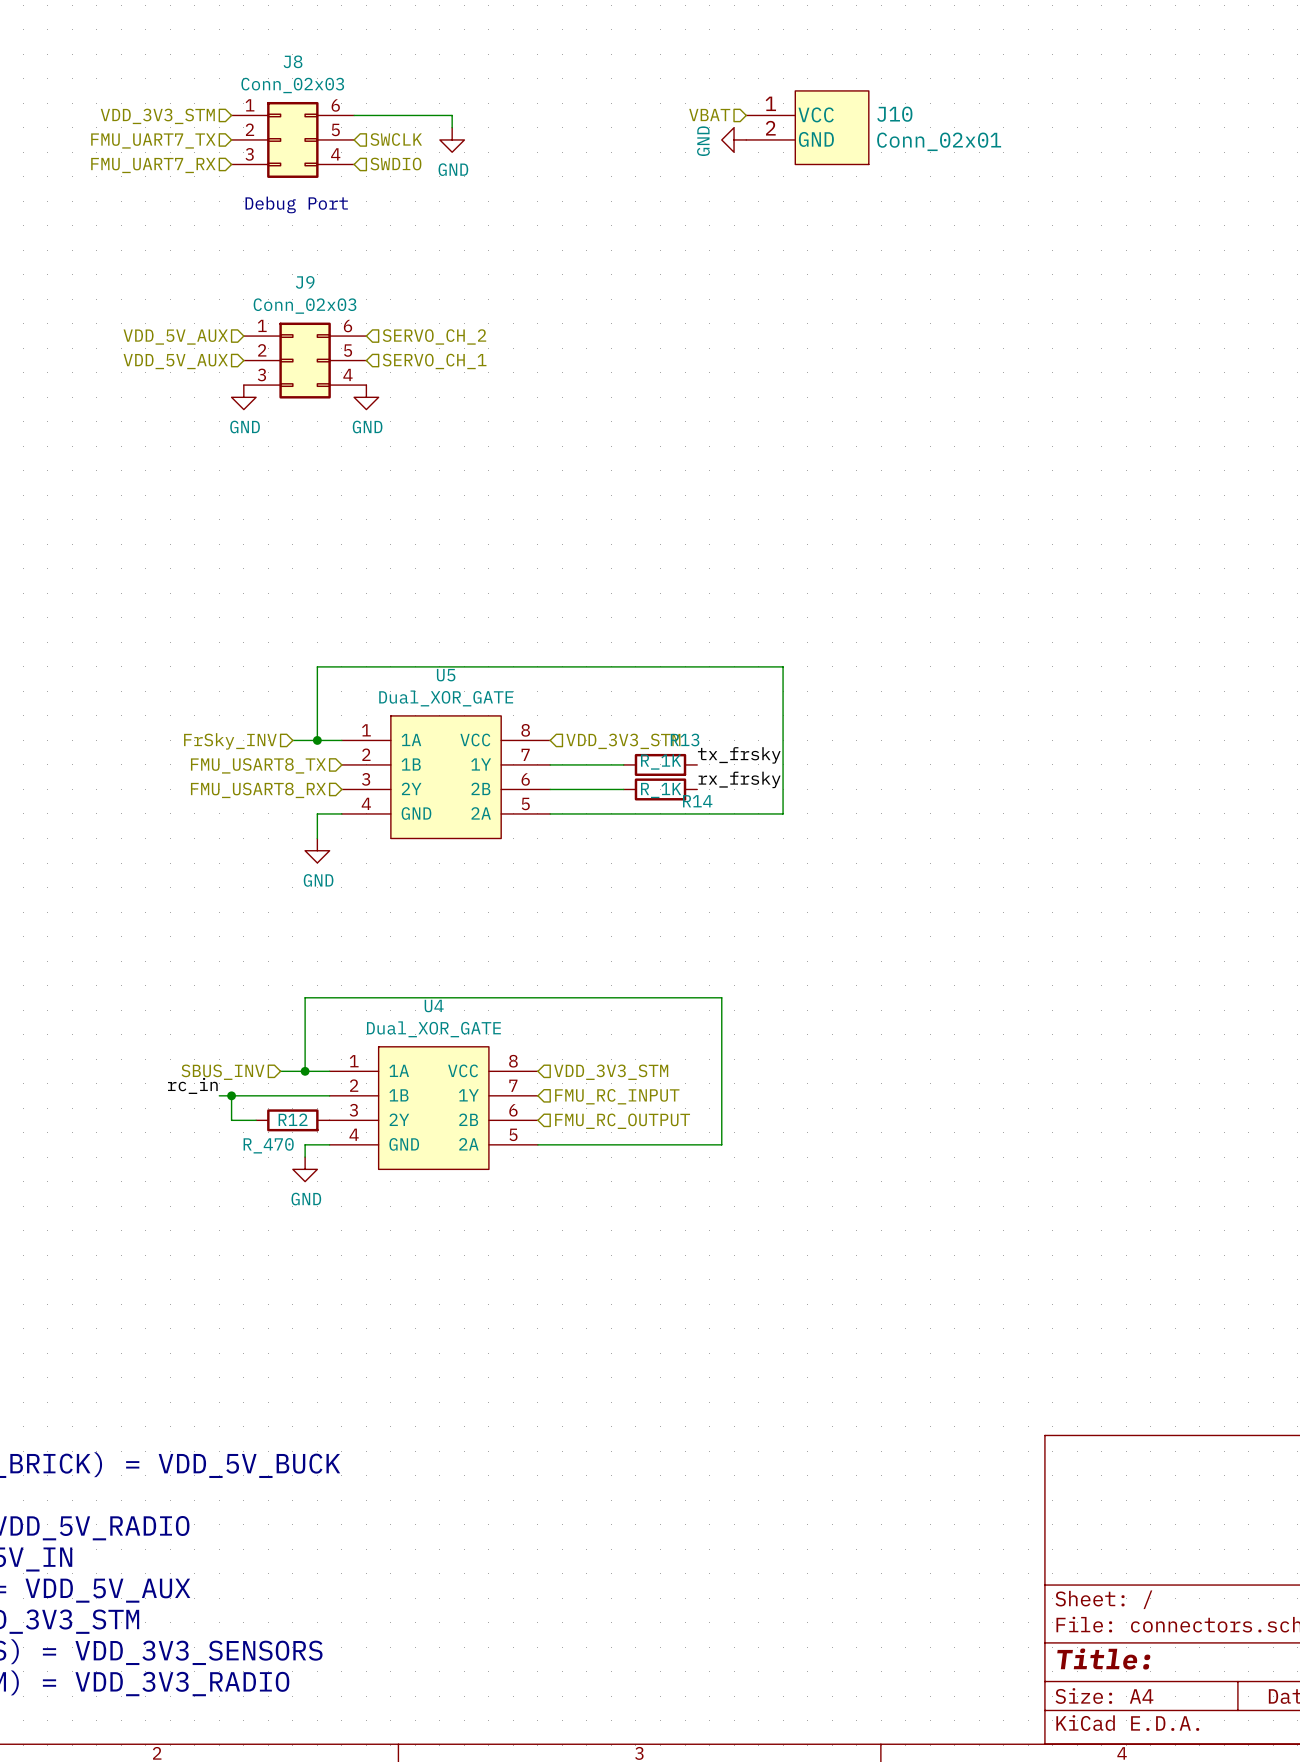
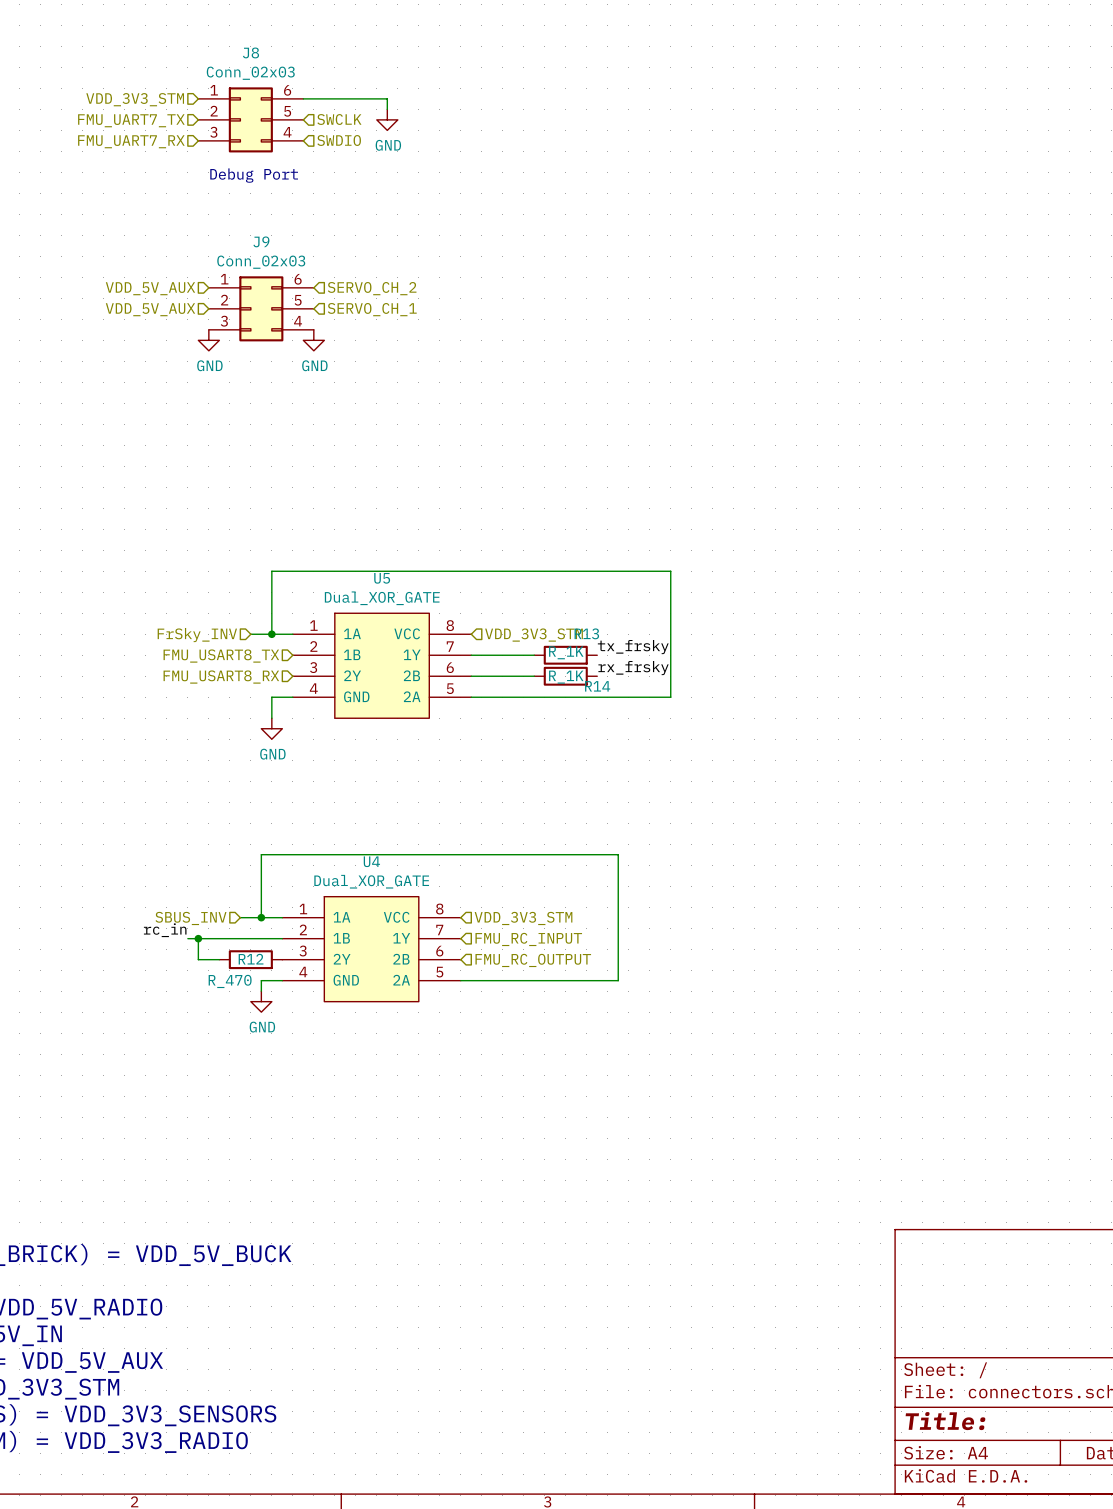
hierarchical label: VBAT (709, 115) -> none
J10: Conn_02x01 (807, 127) -> none
power symbol: GND (734, 139) -> none

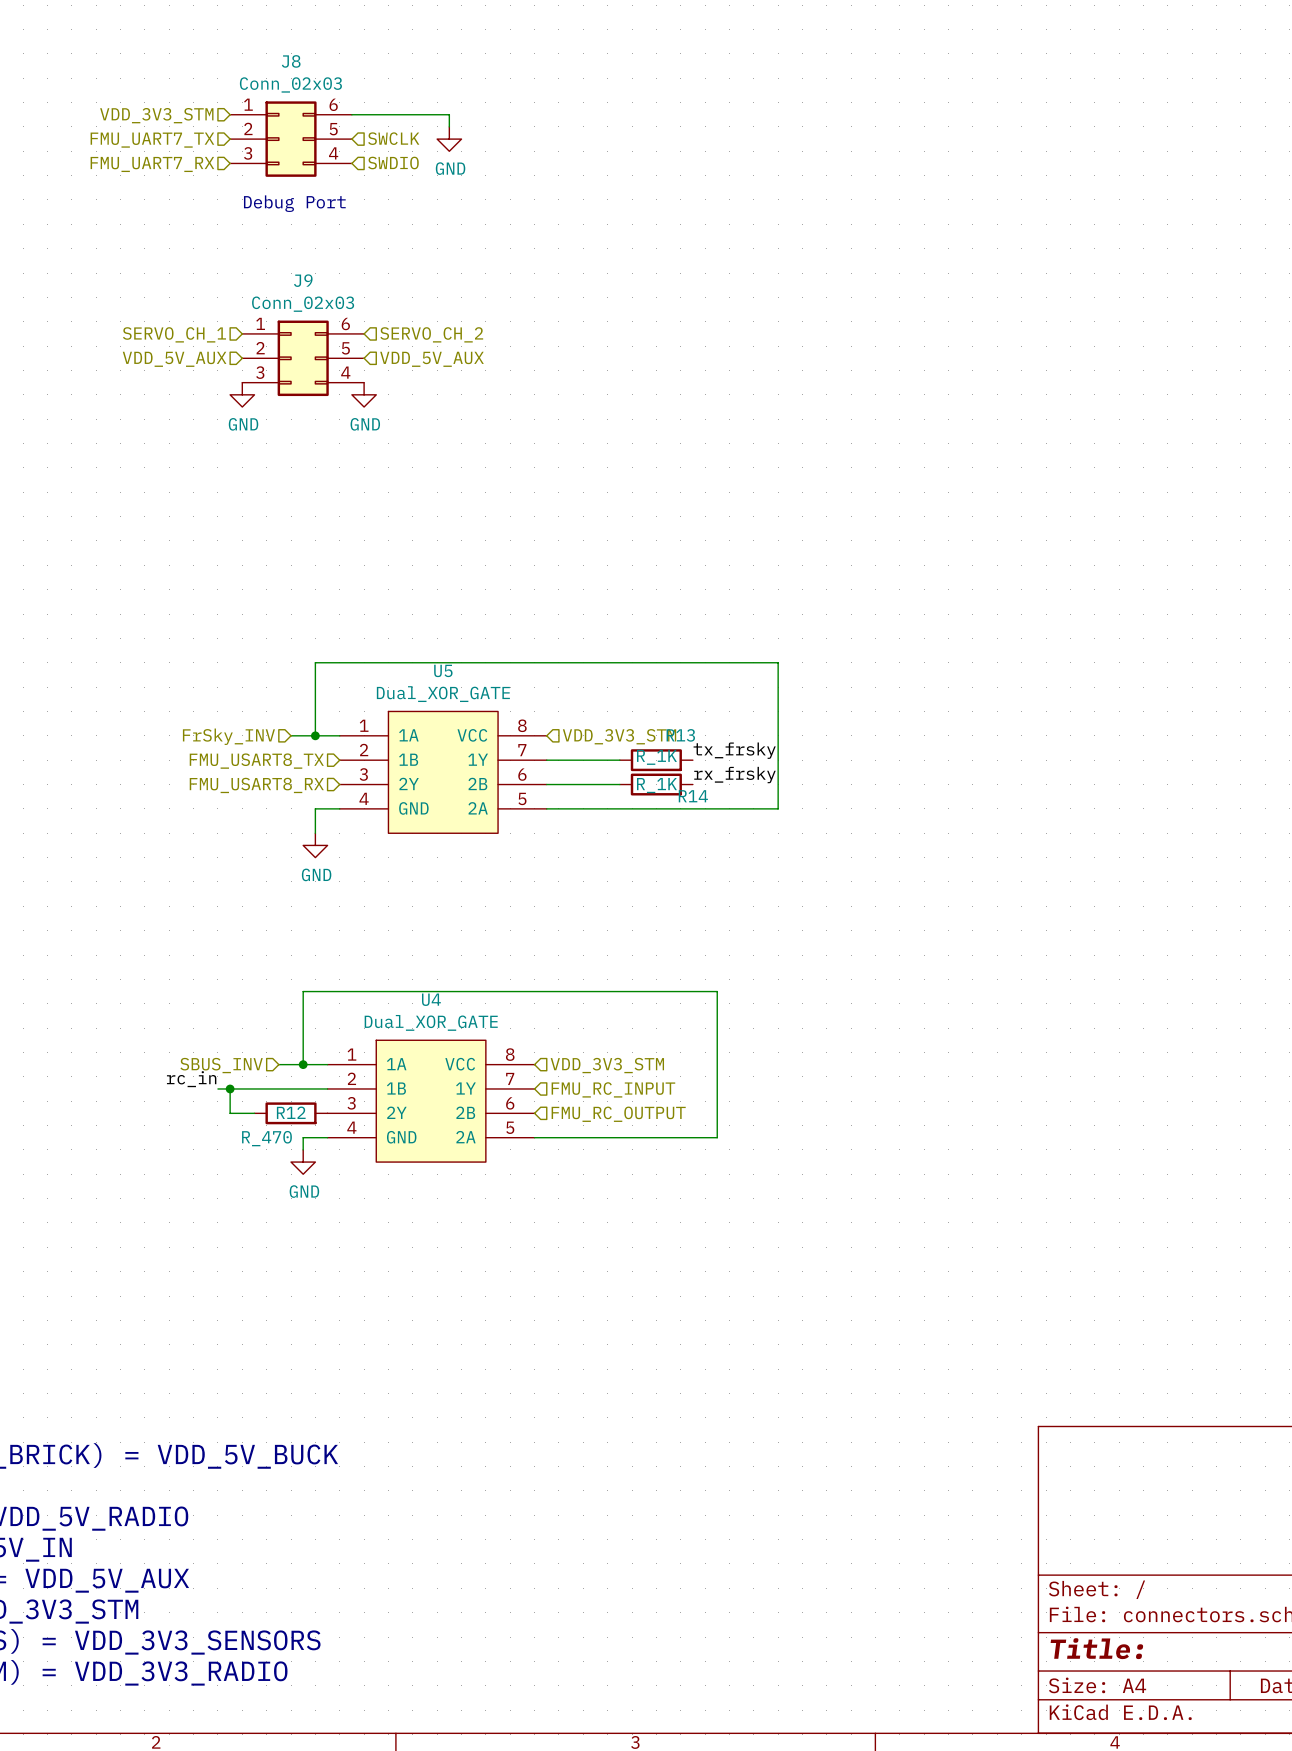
hierarchical label: VDD_5V_AUX (150, 288) -> SERVO_CH_1 (174, 334)
hierarchical label: SERVO_CH_1 (372, 309) -> VDD_5V_AUX (431, 359)

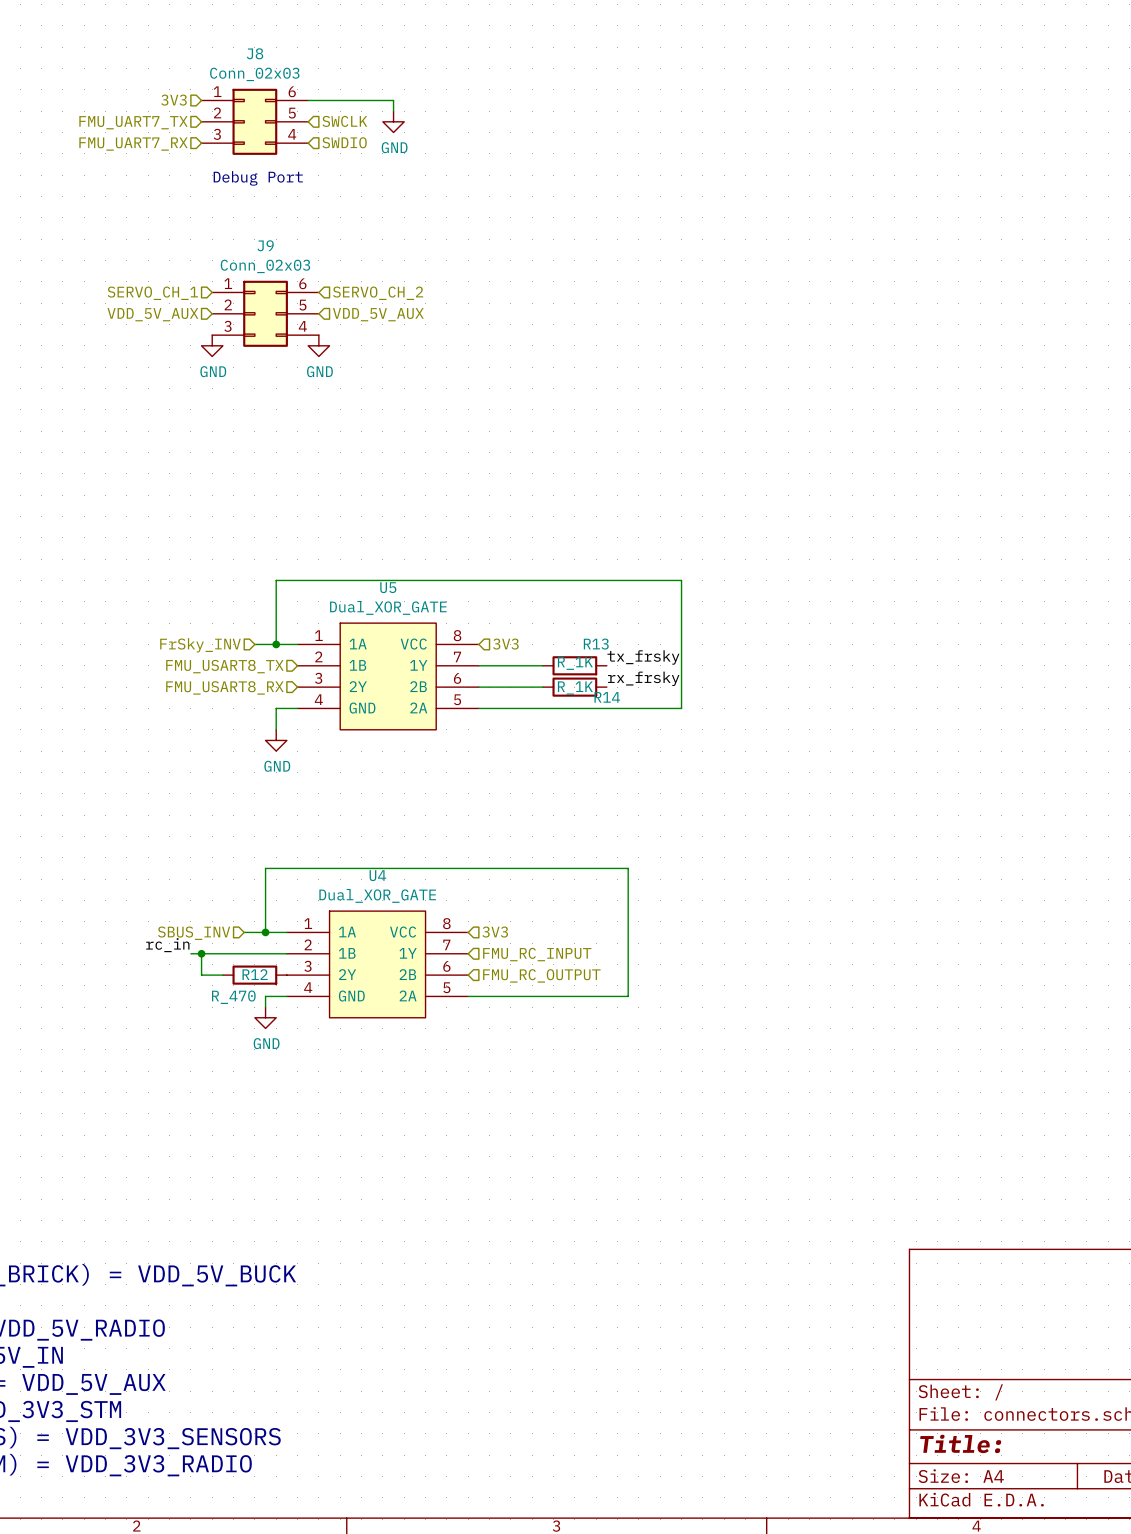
hierarchical label: VDD_3V3_STM (156, 115) -> 3V3 (173, 100)
hierarchical label: VDD_3V3_STM (619, 736) -> 3V3 (505, 644)
hierarchical label: VDD_3V3_STM (607, 1065) -> 3V3 (495, 932)

